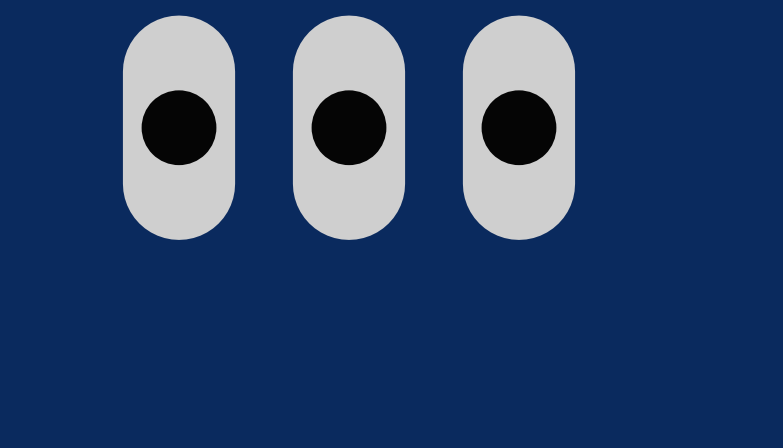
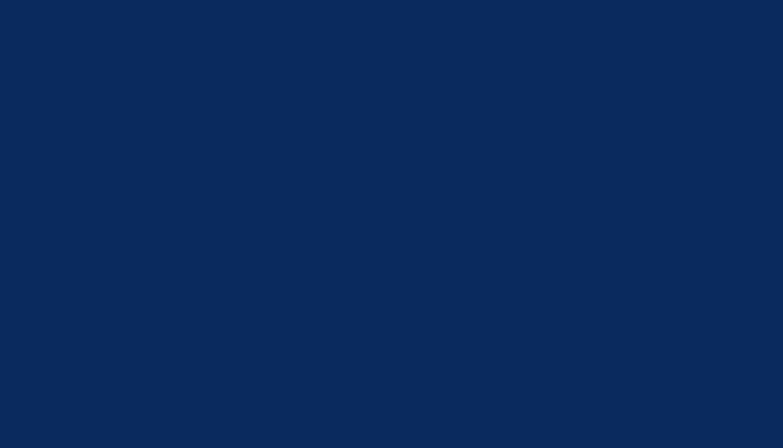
part: (348, 127) -> none

